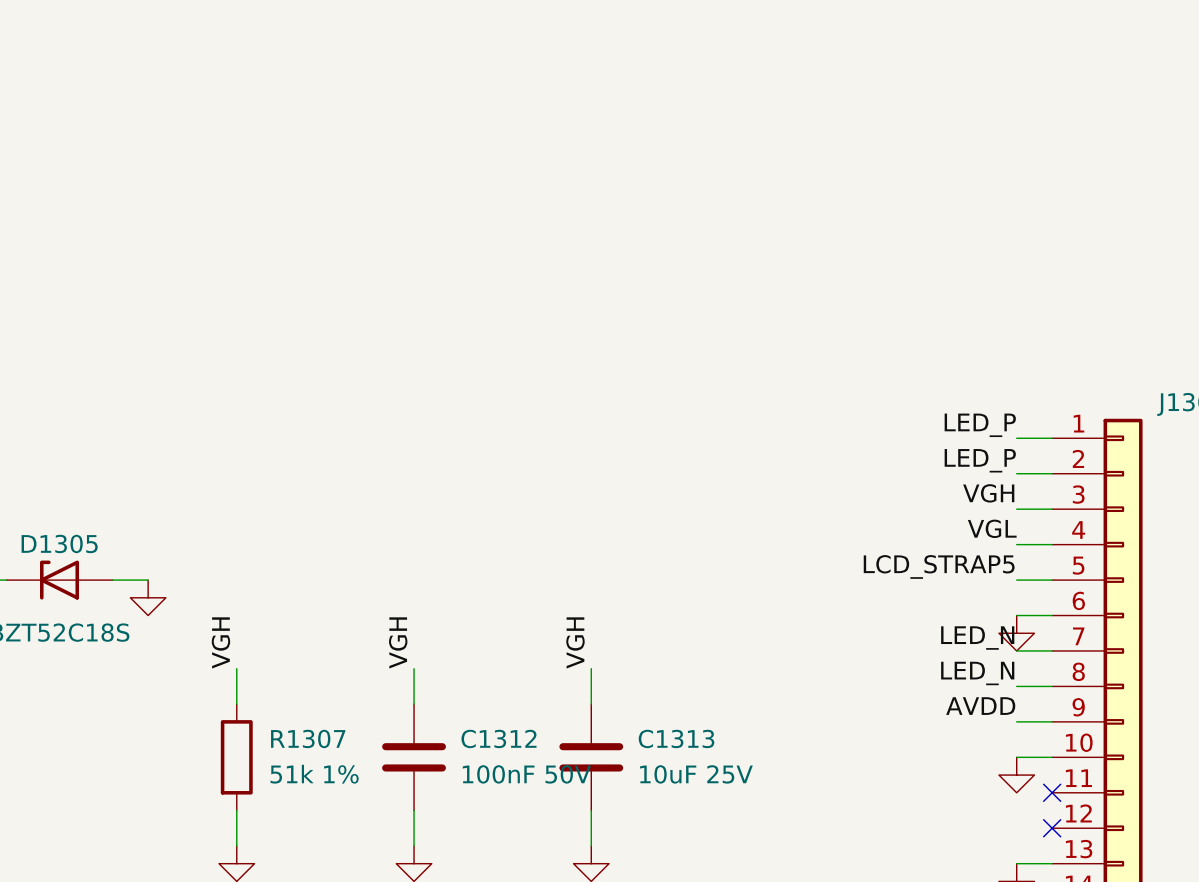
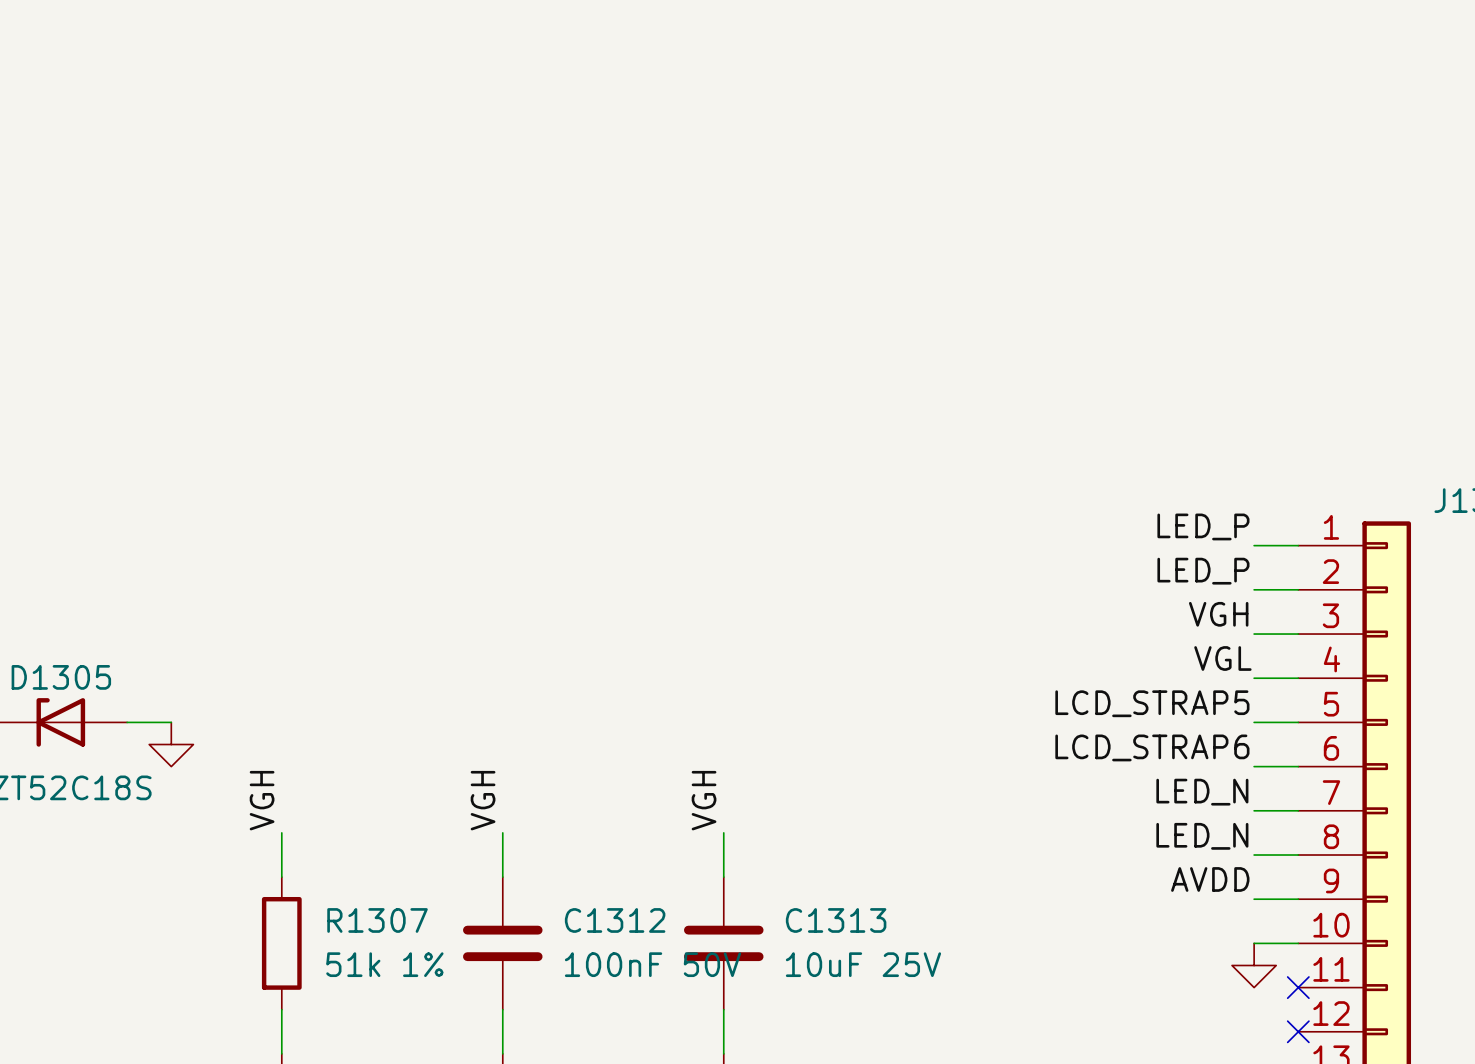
label: none -> LCD_STRAP6 (1152, 747)
power symbol: (1016, 633) -> none

